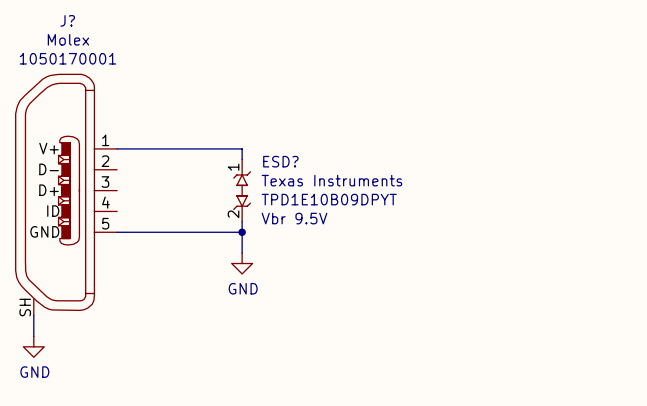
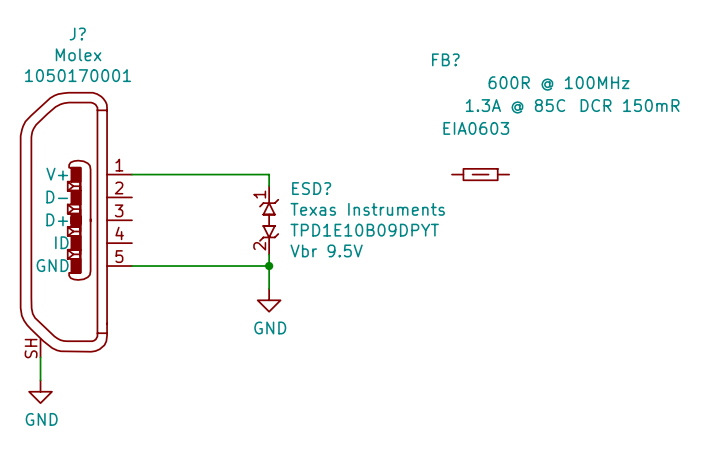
FB?: none -> (480, 174)

